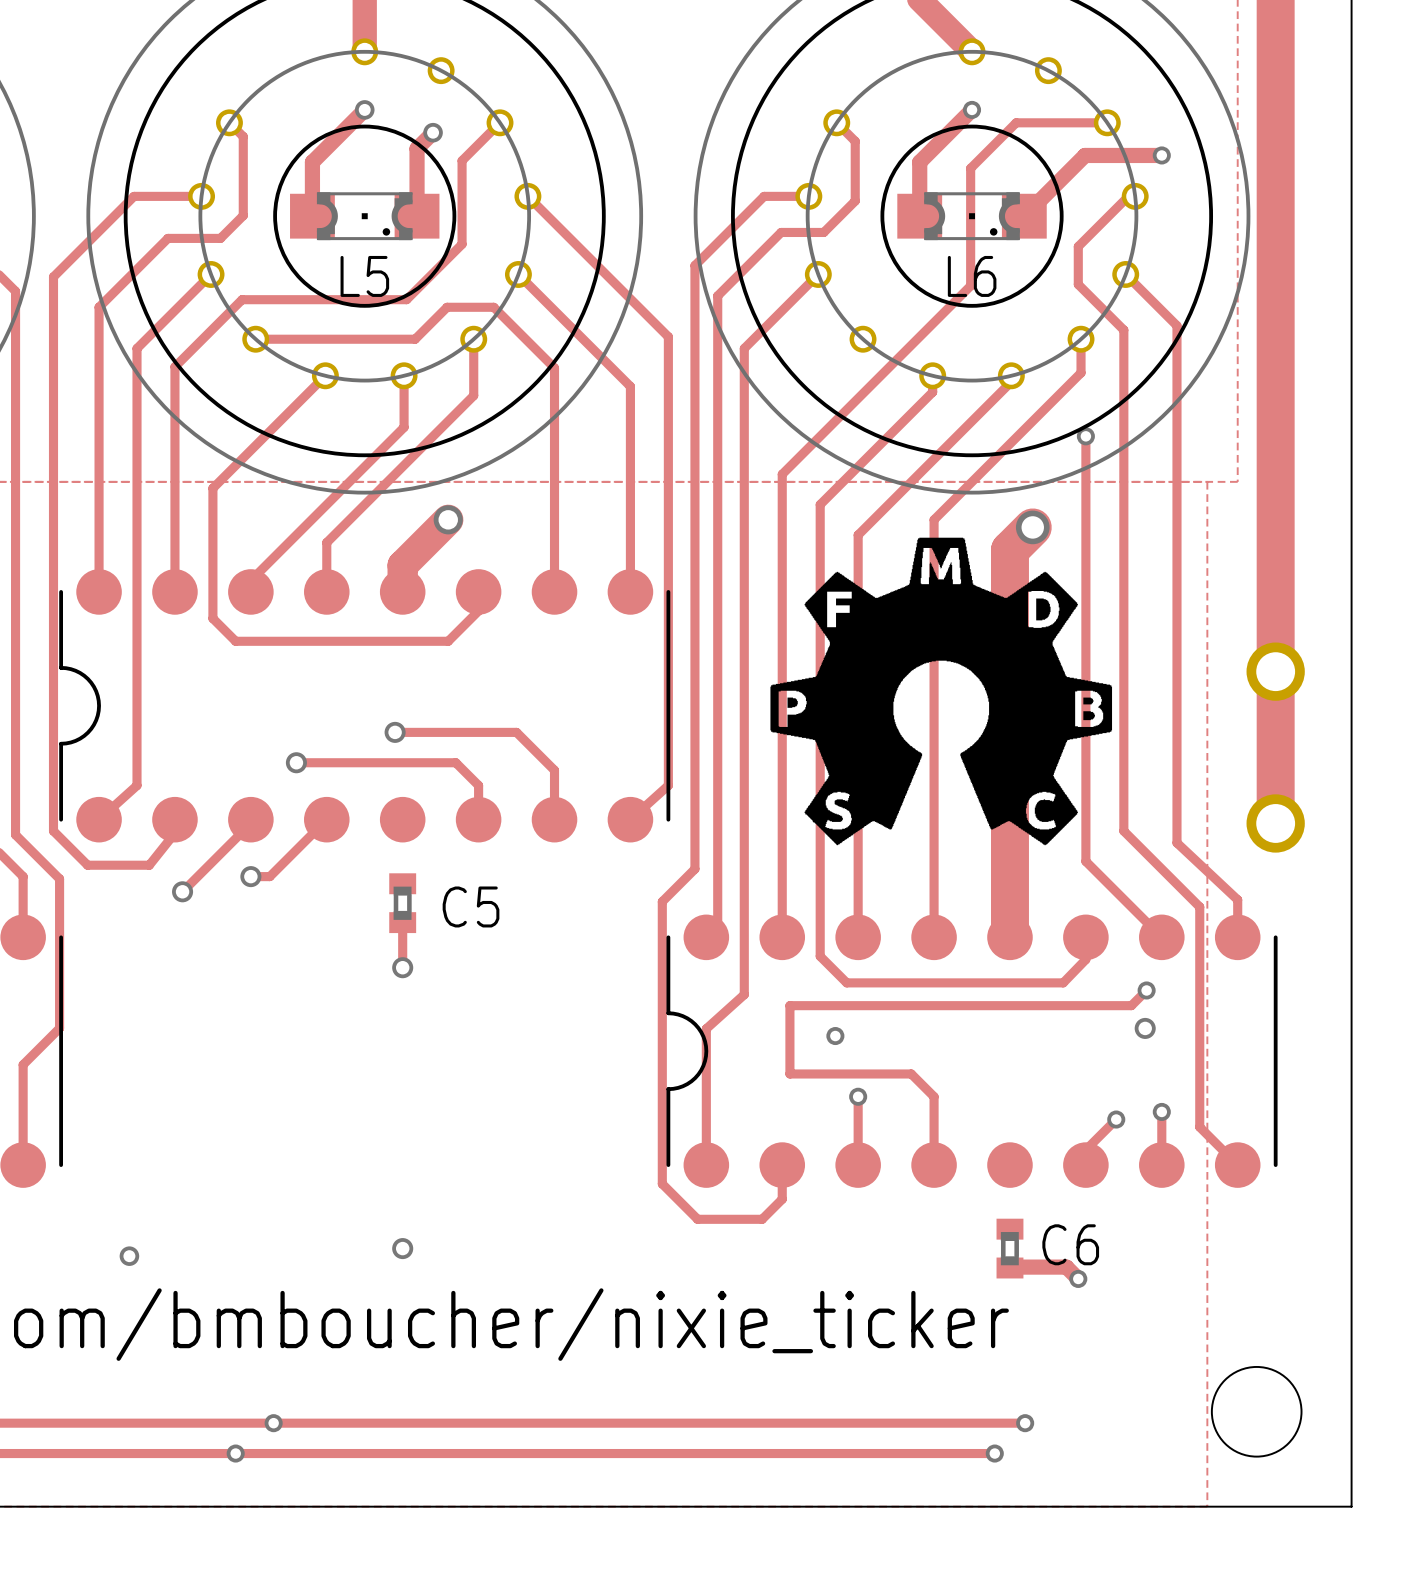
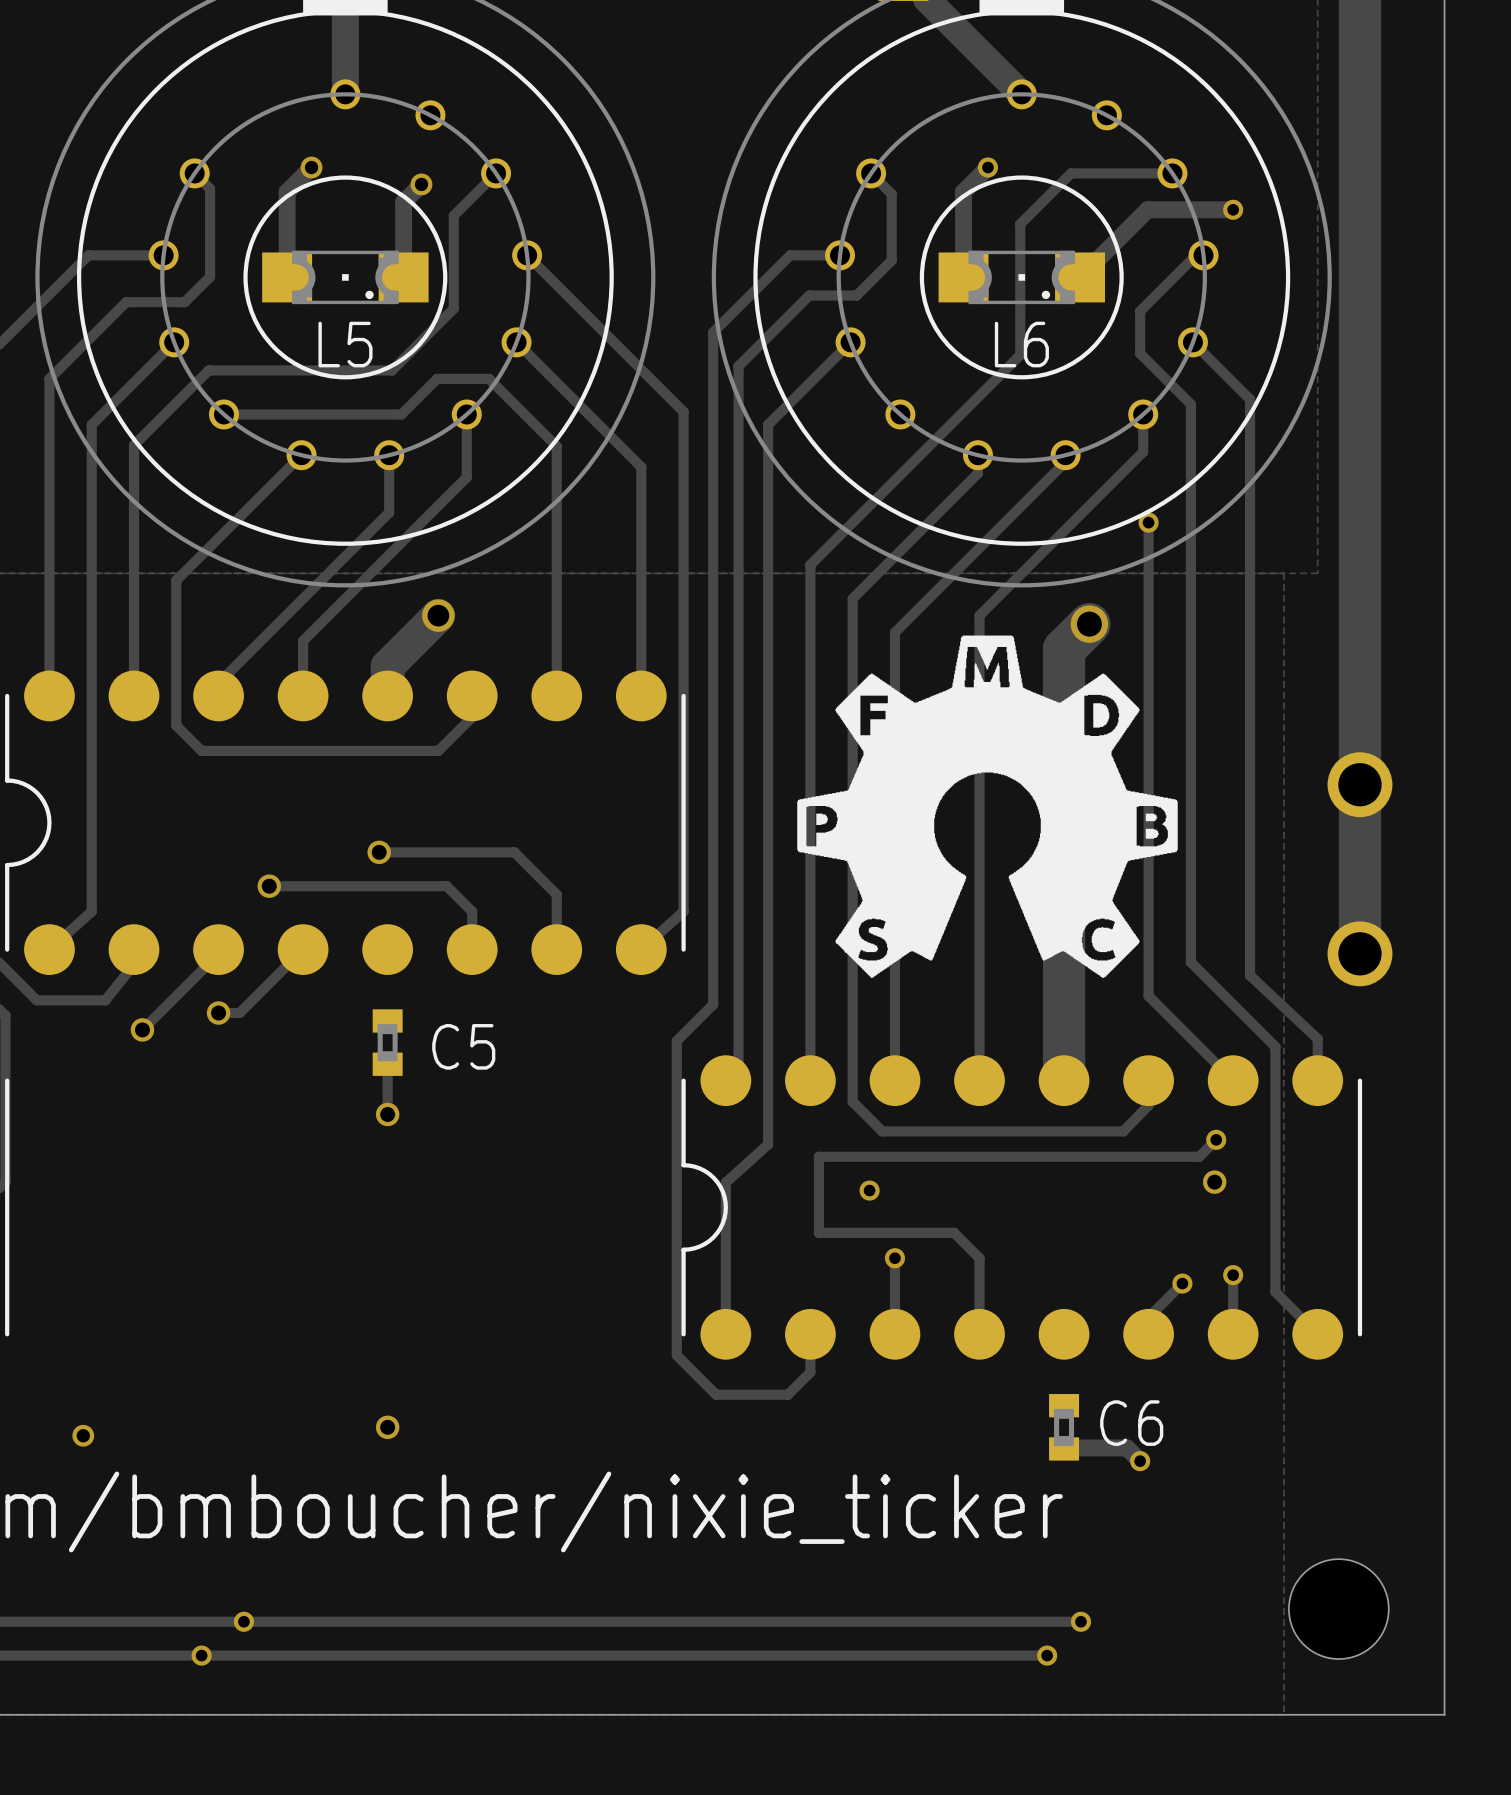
track: (364, 109) (312, 162) -> (311, 167) (287, 191) (287, 217)
via position: (364, 109) -> (311, 167)
track: (972, 109) (919, 162) -> (987, 167) (963, 191) (963, 217)
via position: (972, 109) -> (987, 167)

